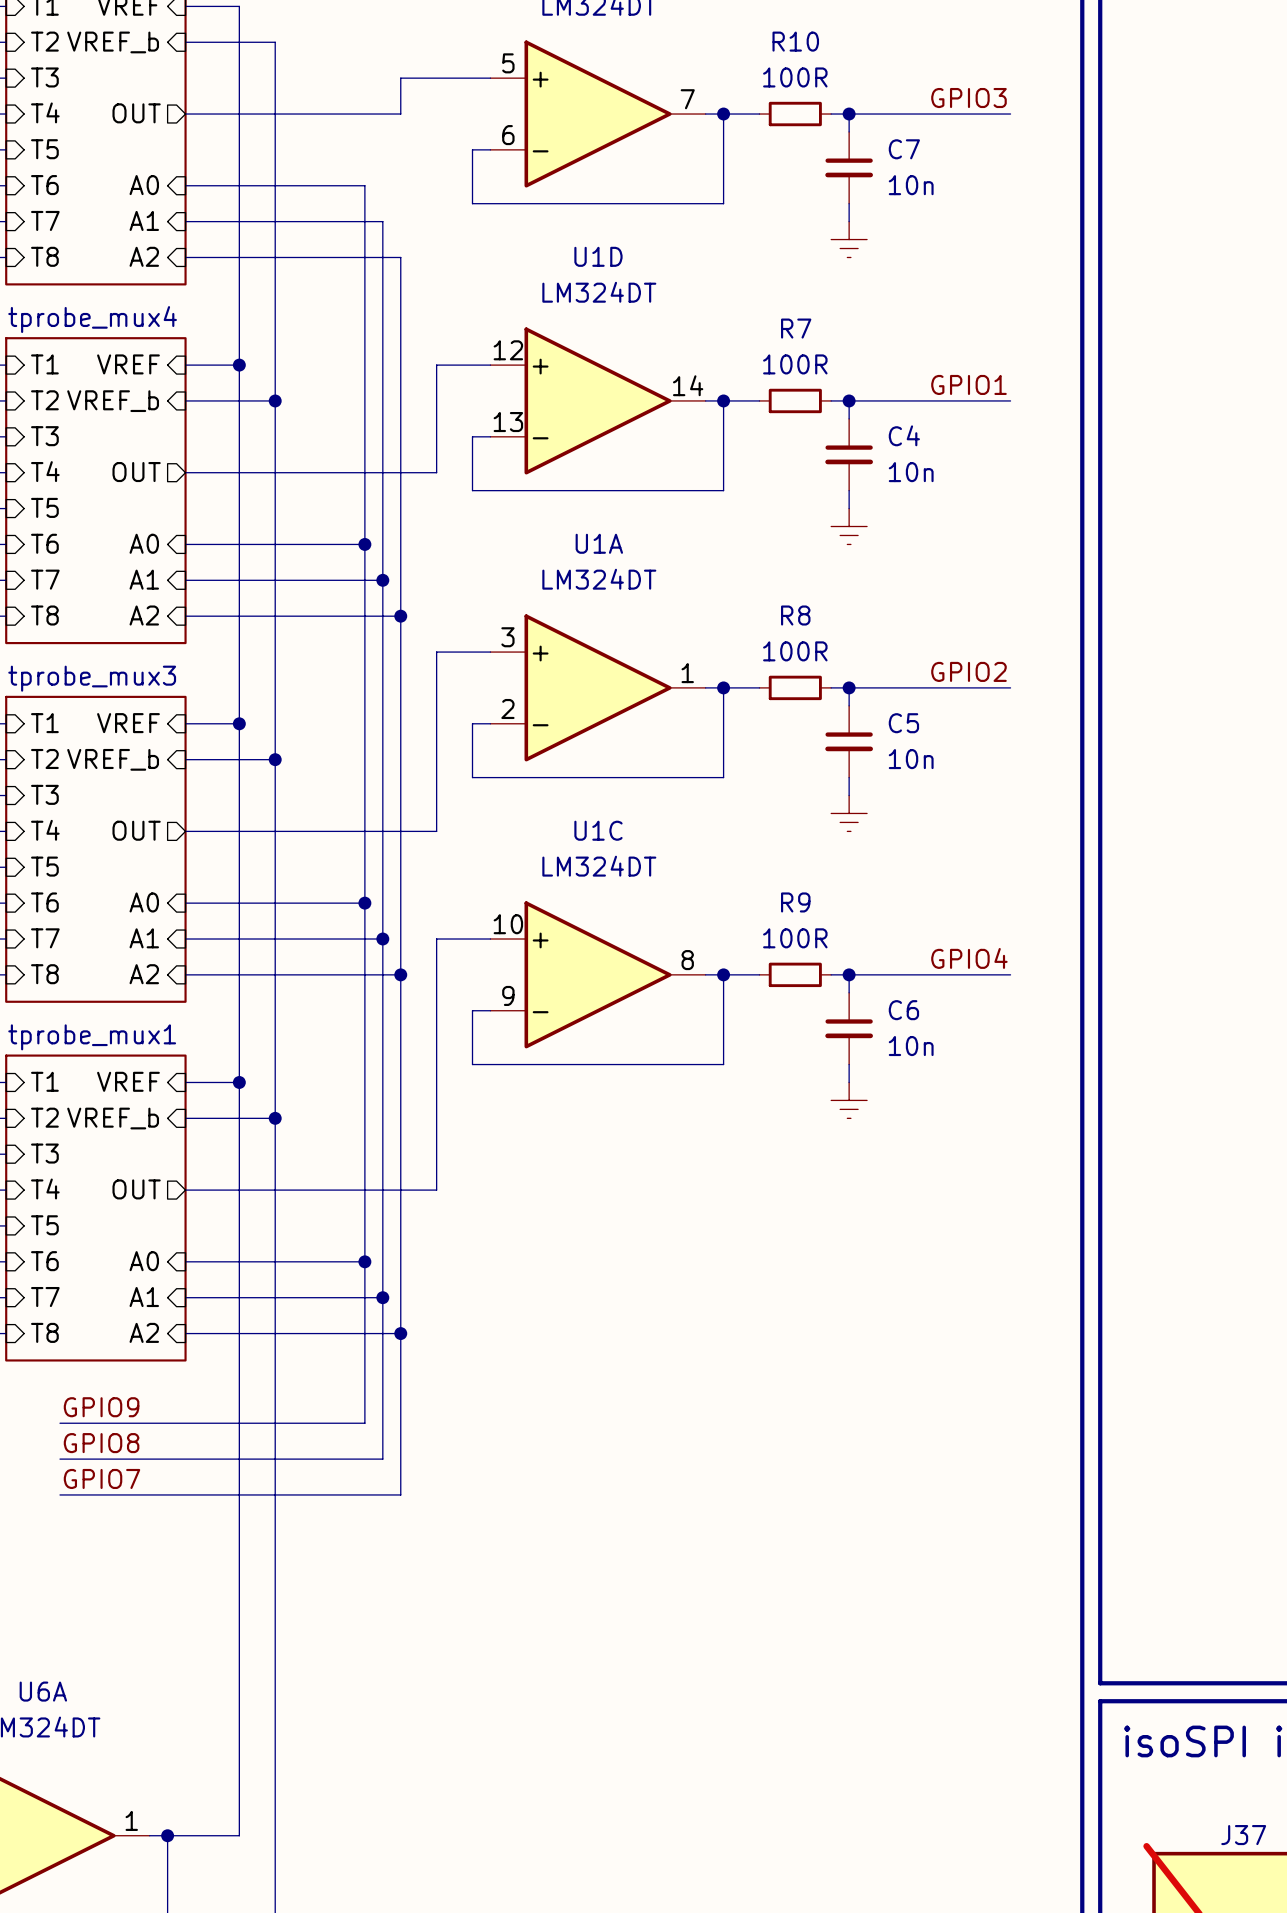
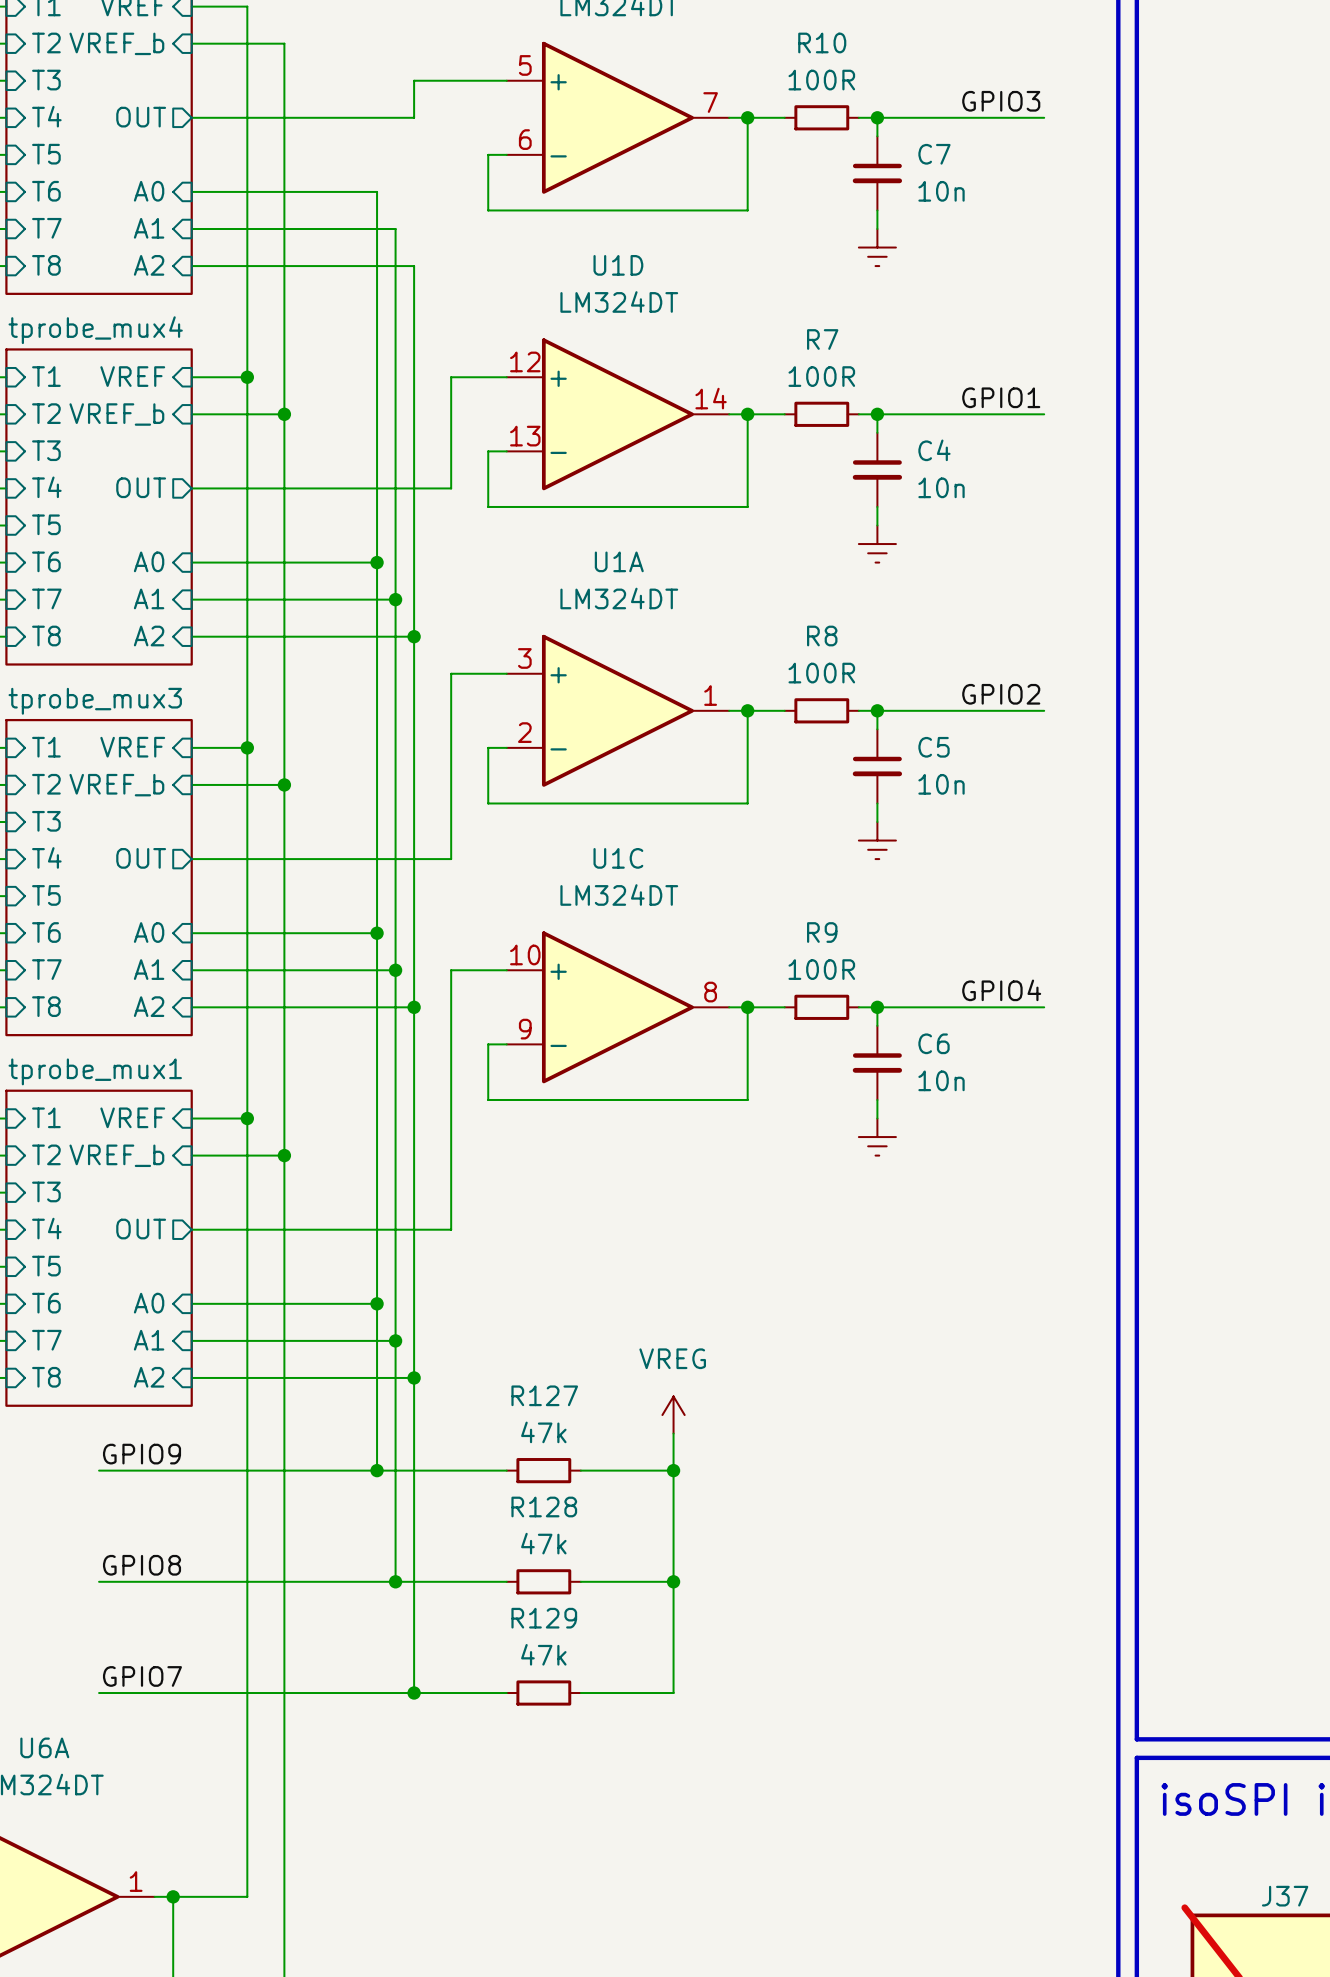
power symbol: none -> VREG (673, 1415)
wire: none -> (673, 1433) (673, 1693) (580, 1693)
label position: GPIO9 (101, 1407) -> GPIO9 (142, 1454)
wire: (60, 1423) (95, 1423) -> none
wire: none -> (377, 1470) (506, 1470)
junction: none -> (377, 1470)
R127: none -> 47k (543, 1470)
wire: none -> (580, 1470) (673, 1470)
junction: none -> (673, 1470)
label position: GPIO8 (101, 1443) -> GPIO8 (142, 1565)
wire: (60, 1459) (382, 1459) -> (395, 1581) (395, 1507)
label position: GPIO7 (101, 1478) -> GPIO7 (142, 1676)
wire: (60, 1494) (400, 1494) -> (414, 1693) (414, 1544)
wire: none -> (99, 1581) (506, 1581)
junction: none -> (395, 1581)
R128: none -> 47k (543, 1581)
wire: none -> (580, 1581) (673, 1581)
junction: none -> (673, 1581)
wire: none -> (99, 1693) (506, 1693)
junction: none -> (414, 1693)
R129: none -> 47k (543, 1693)

